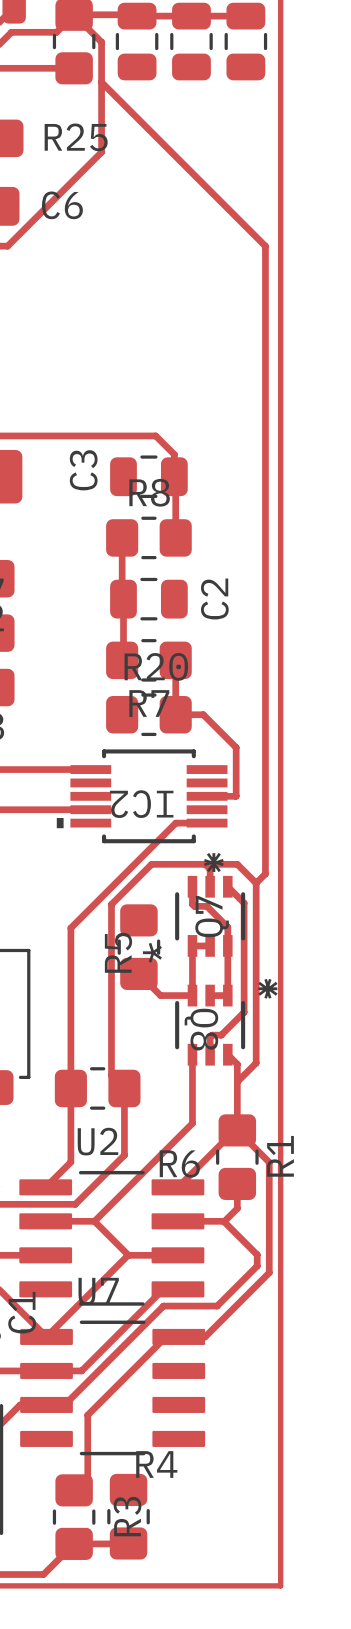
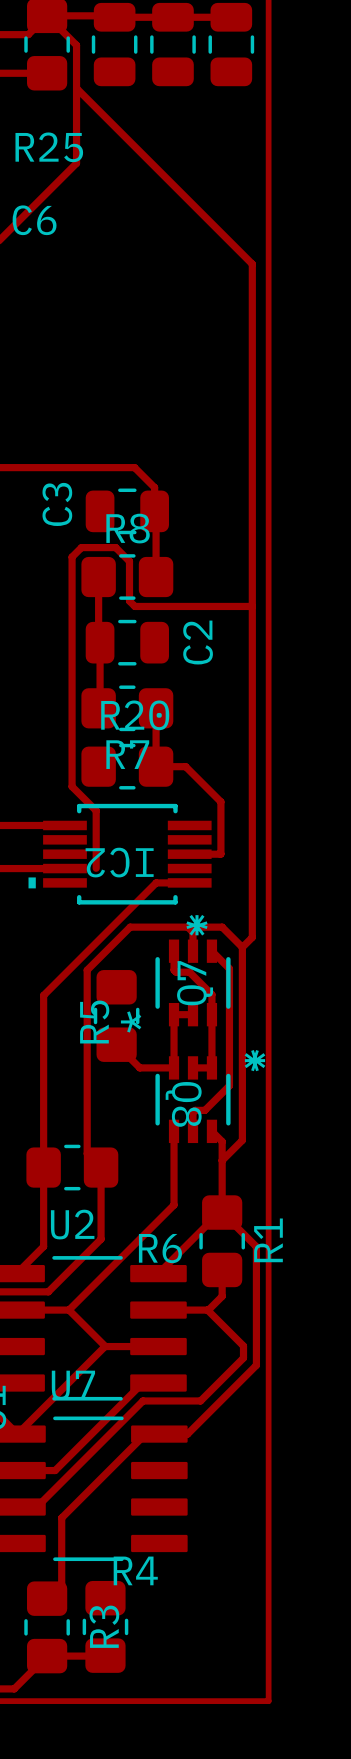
top track: none -> (252, 606) (134, 606) (129, 601) (129, 561) (115, 547) (81, 547) (72, 557) (72, 786) (96, 810) (96, 868)

